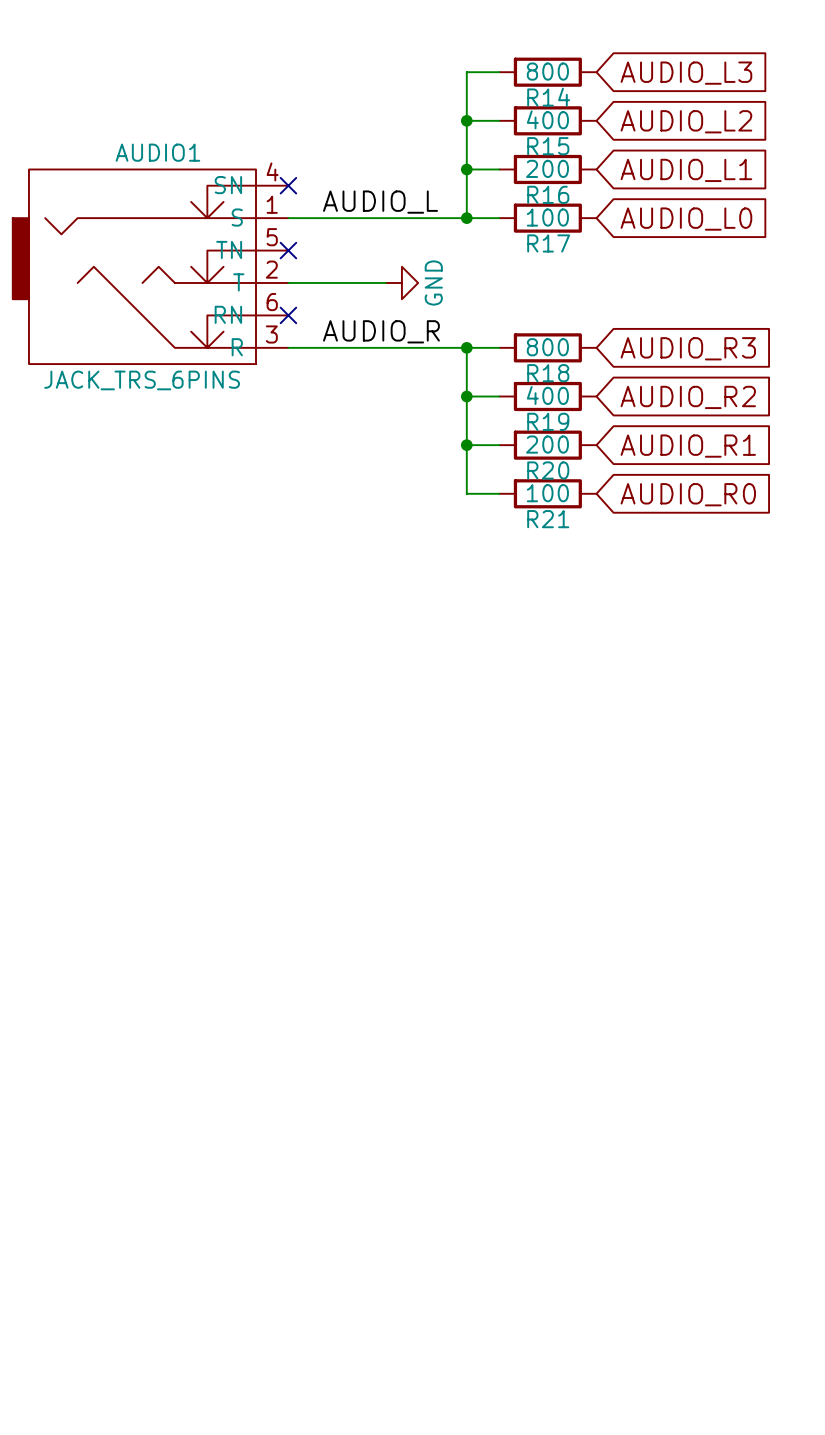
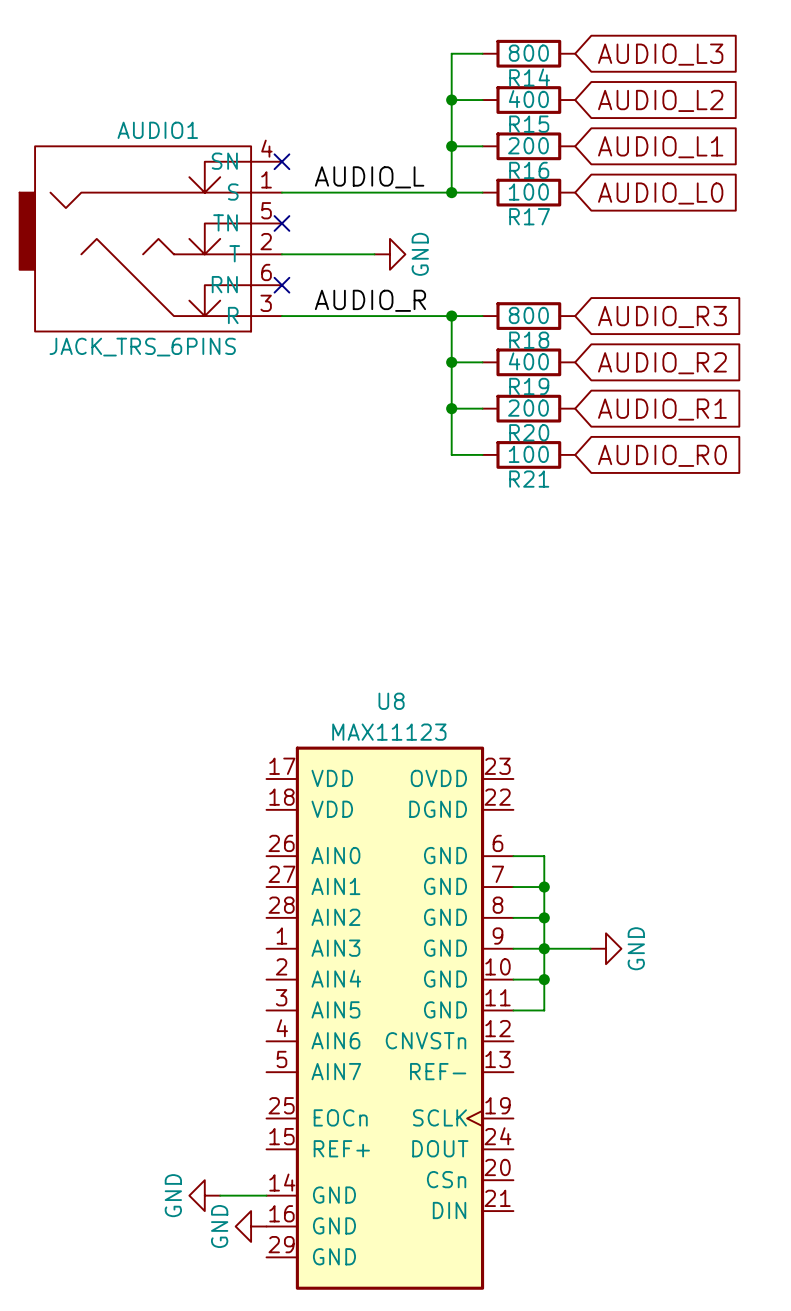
wire: none -> (513, 856) (544, 856) (544, 1010) (513, 1010)
wire: none -> (513, 887) (544, 887)
junction: none -> (544, 887)
wire: none -> (513, 917) (544, 917)
junction: none -> (544, 917)
wire: none -> (513, 948) (590, 948)
junction: none -> (544, 948)
power symbol: none -> GND (606, 948)
wire: none -> (513, 979) (544, 979)
junction: none -> (544, 979)
U8: none -> MAX11123 (389, 1018)
power symbol: none -> GND (204, 1195)
wire: none -> (220, 1195) (266, 1195)
power symbol: none -> GND (251, 1226)

